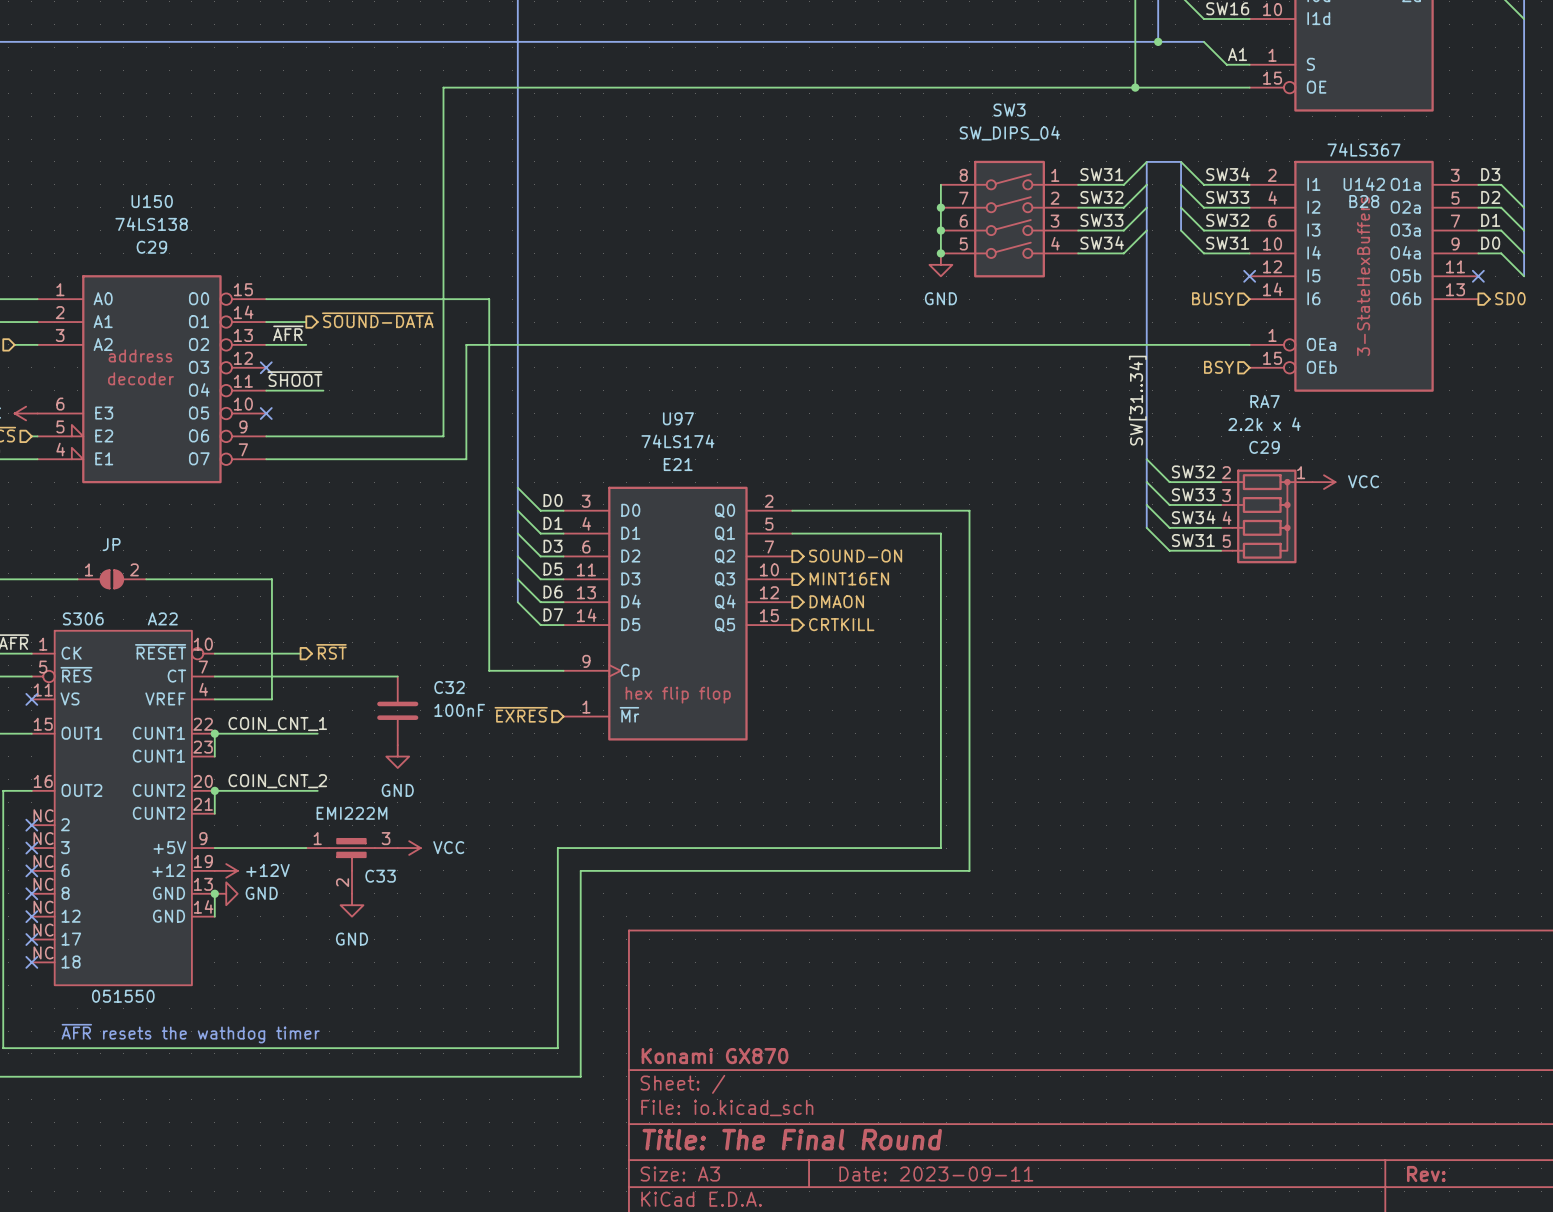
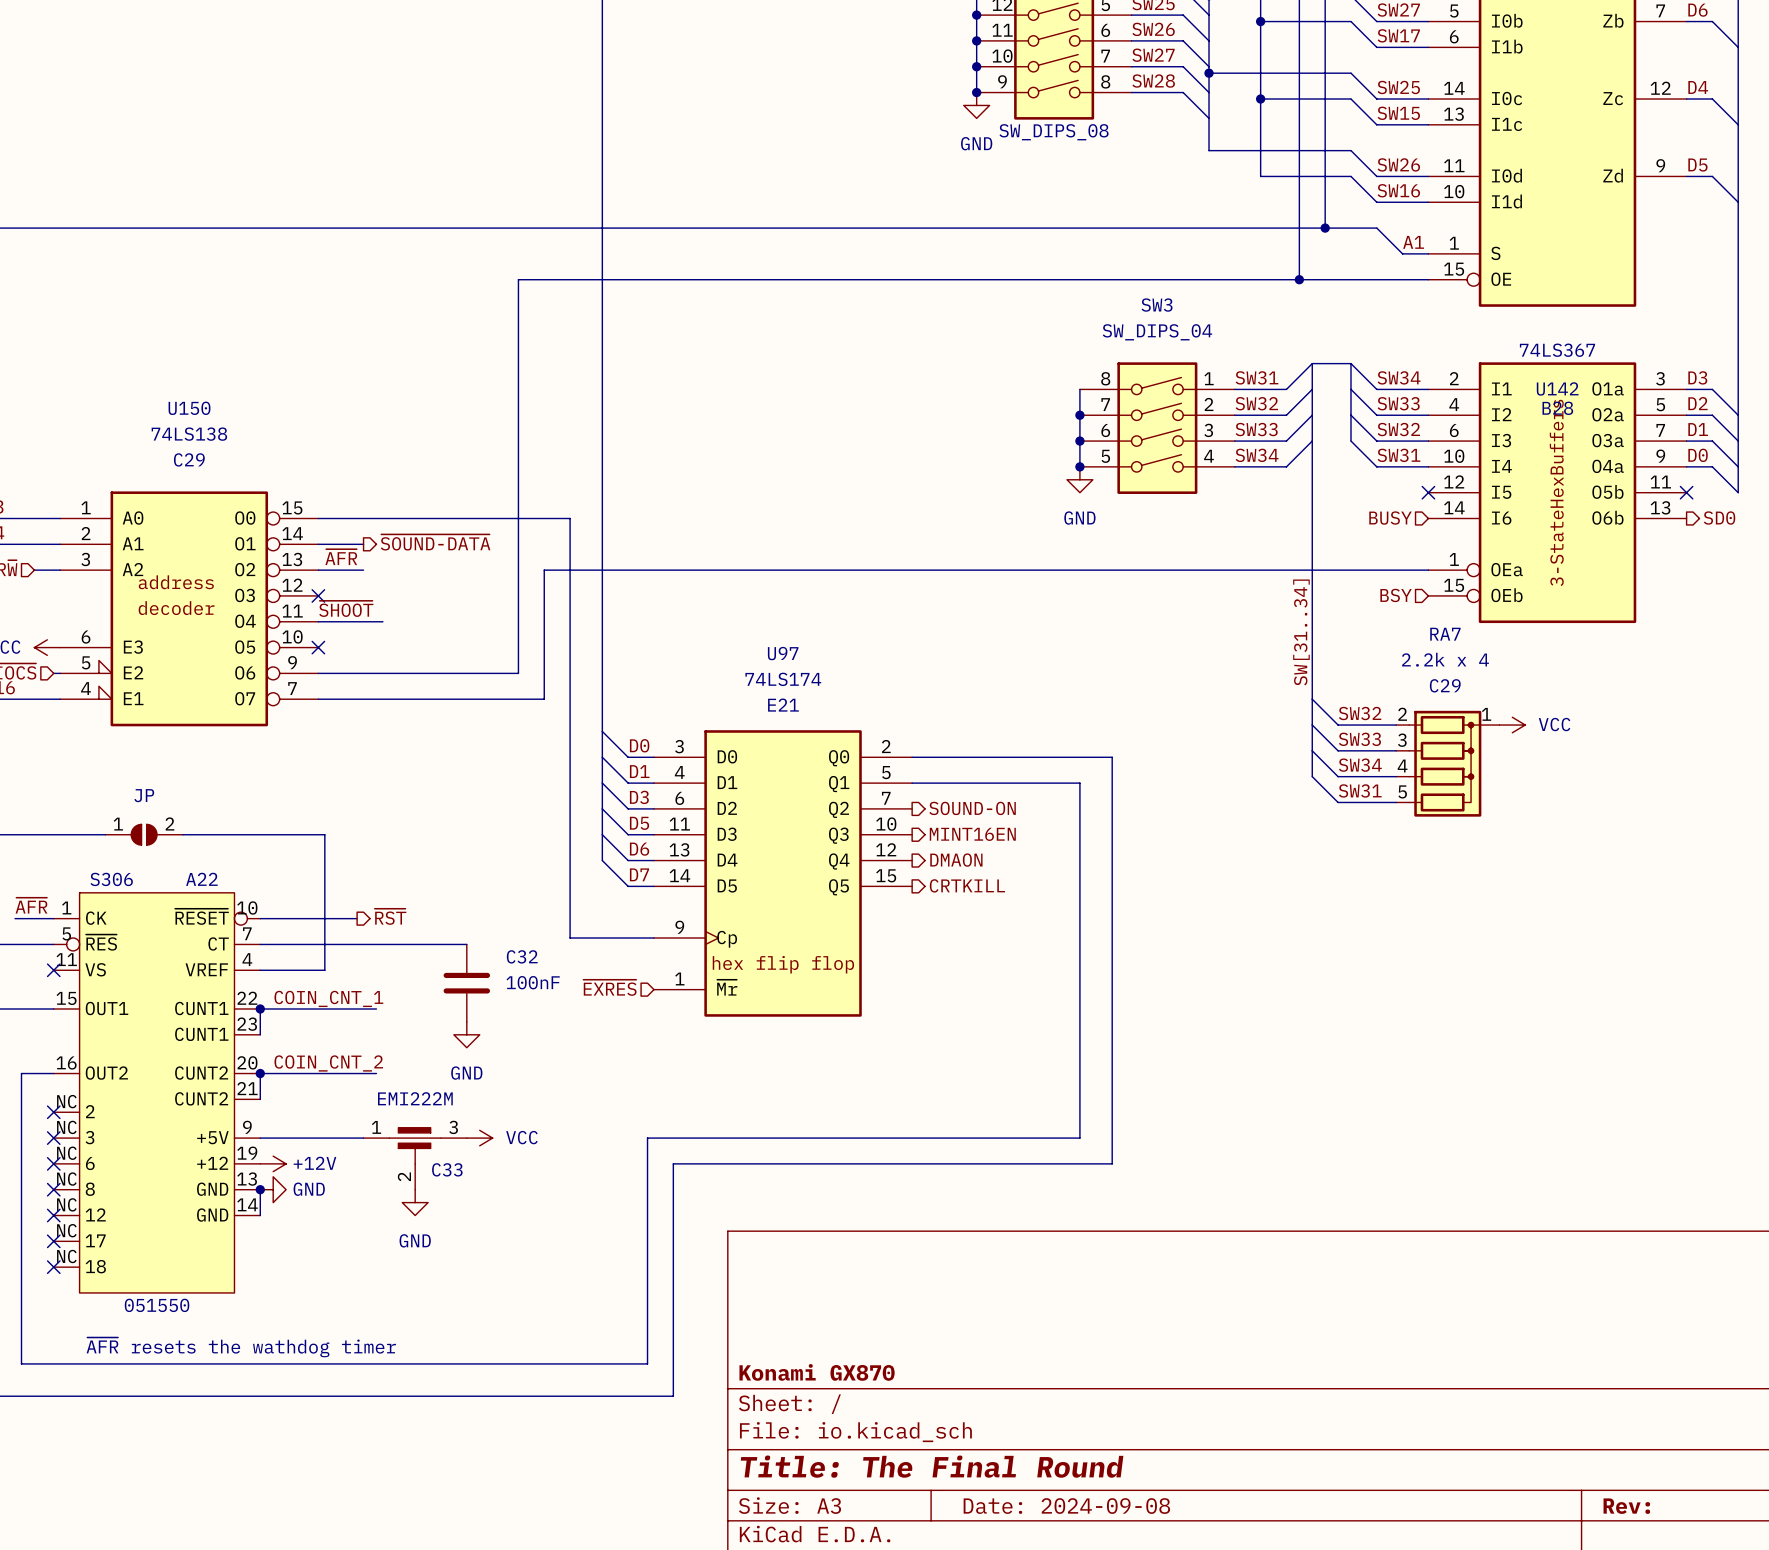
title block: Date: 2023-09-11 (936, 1174) -> Date: 2024-09-08 (1066, 1506)

